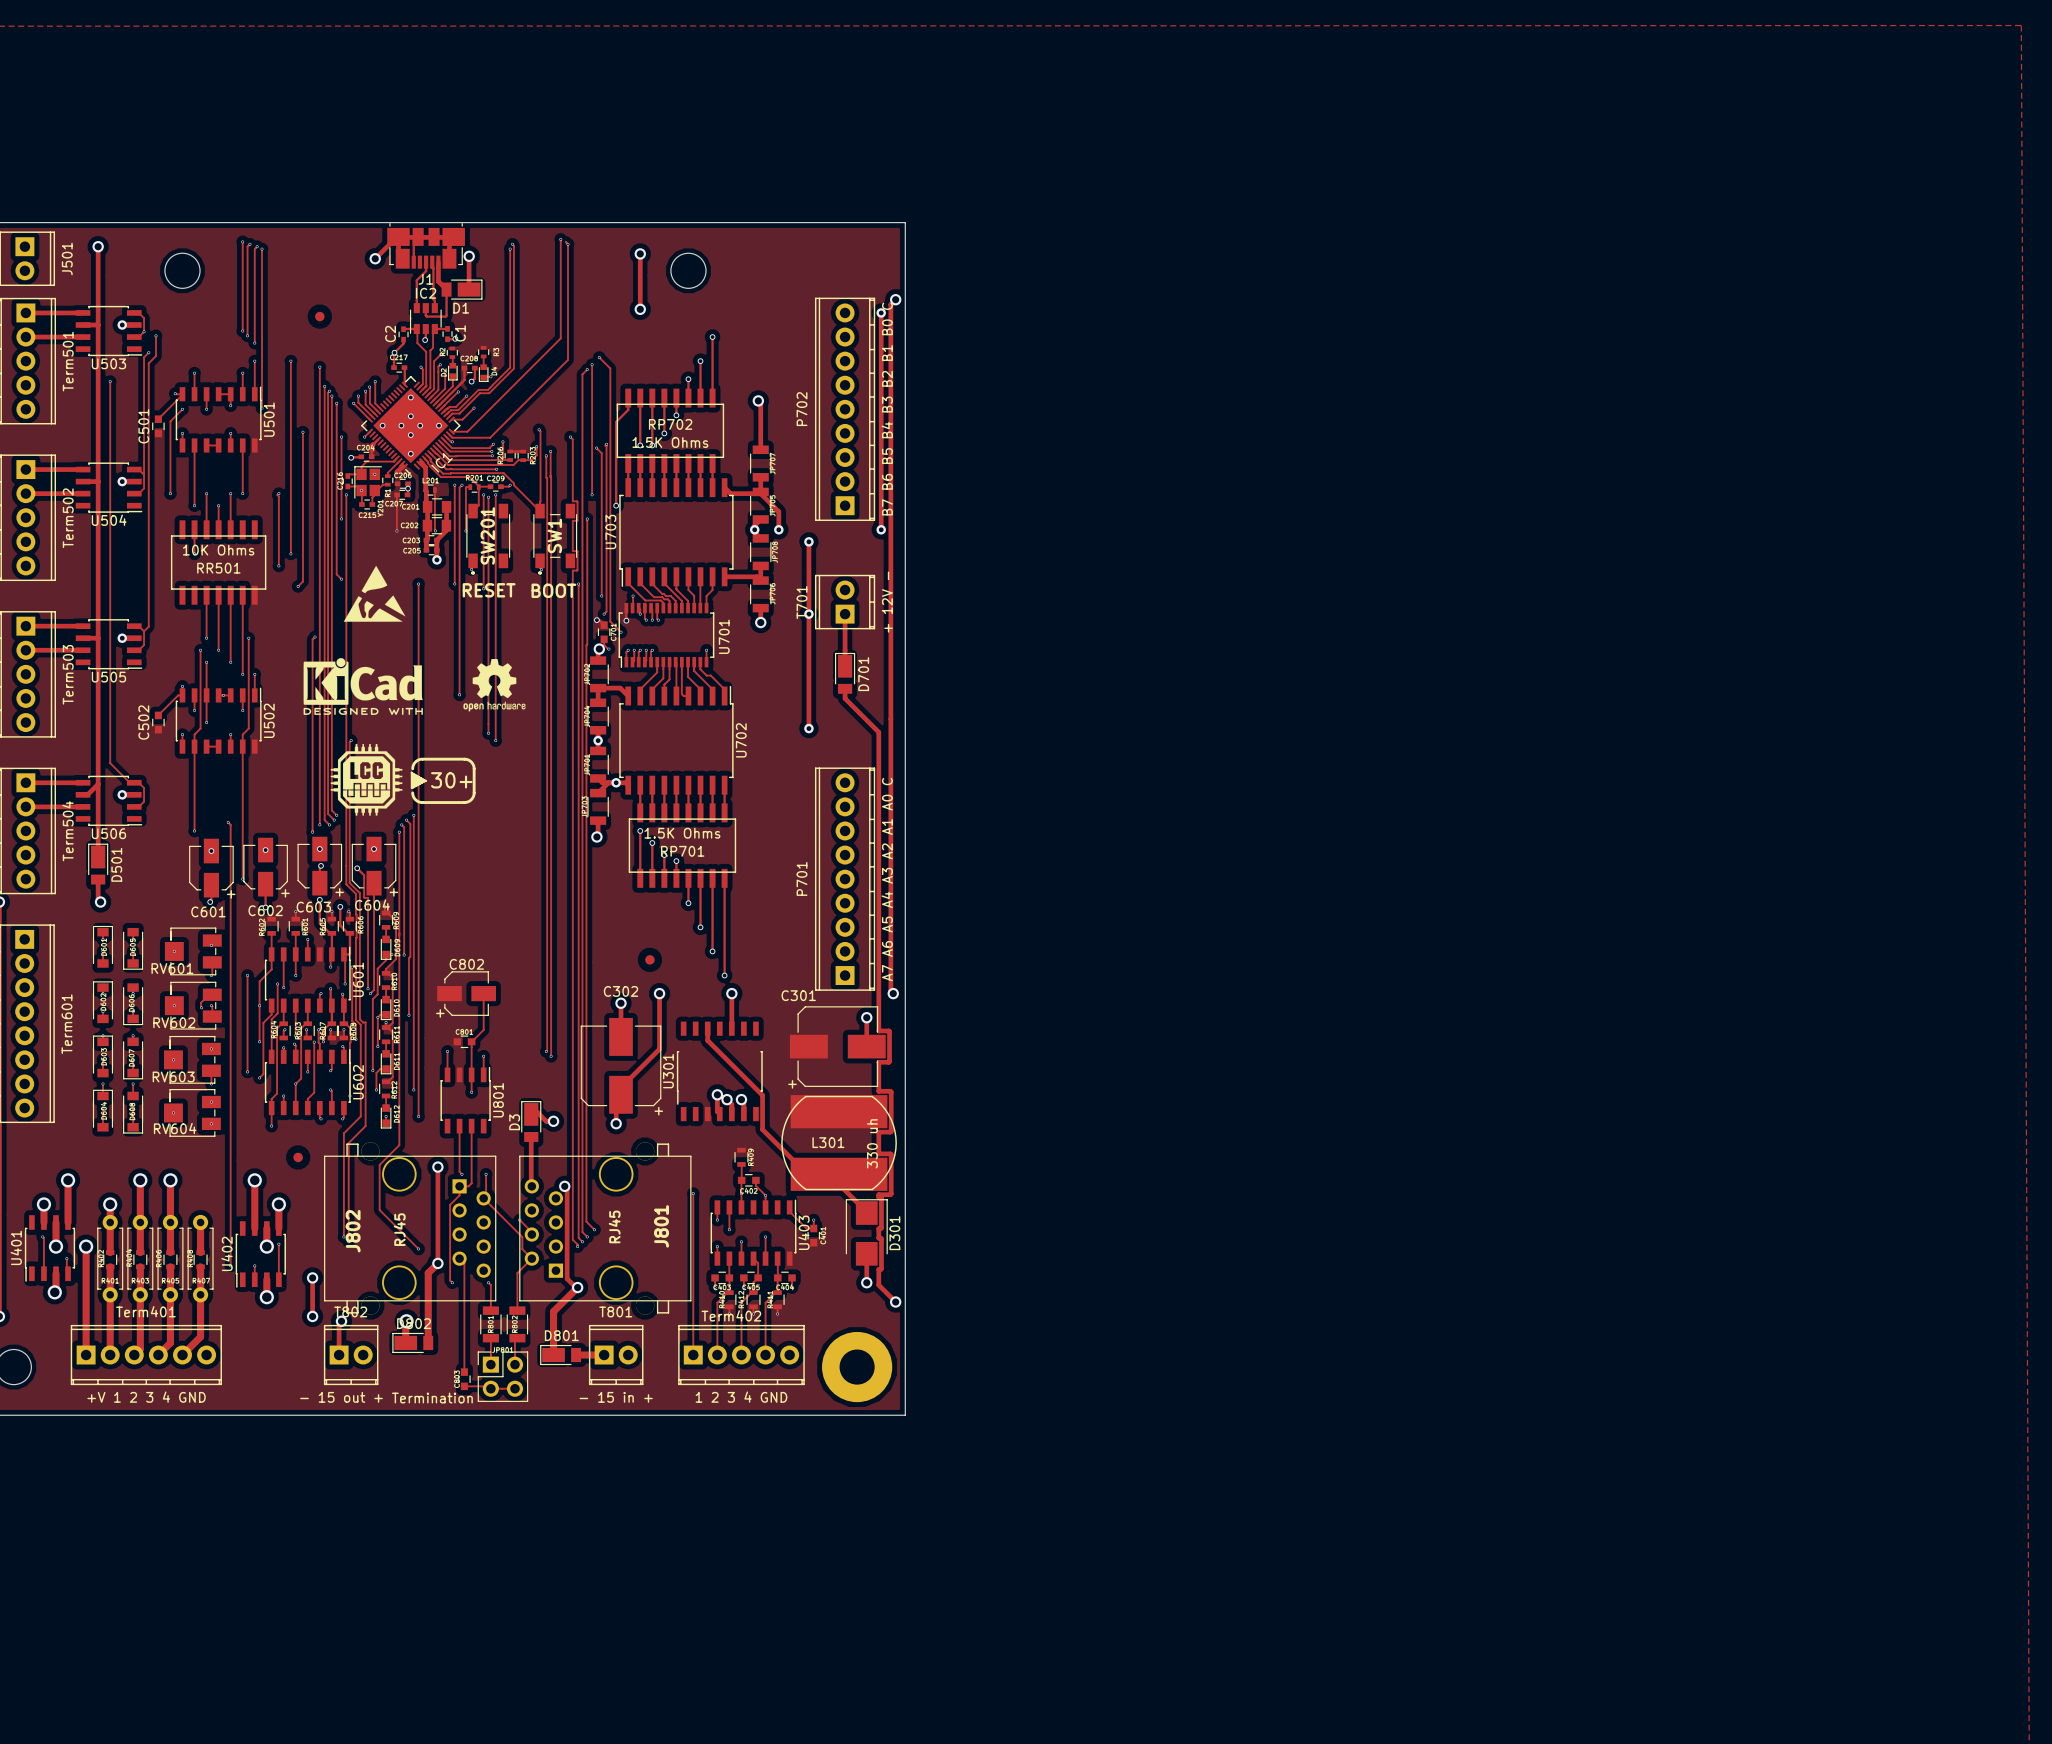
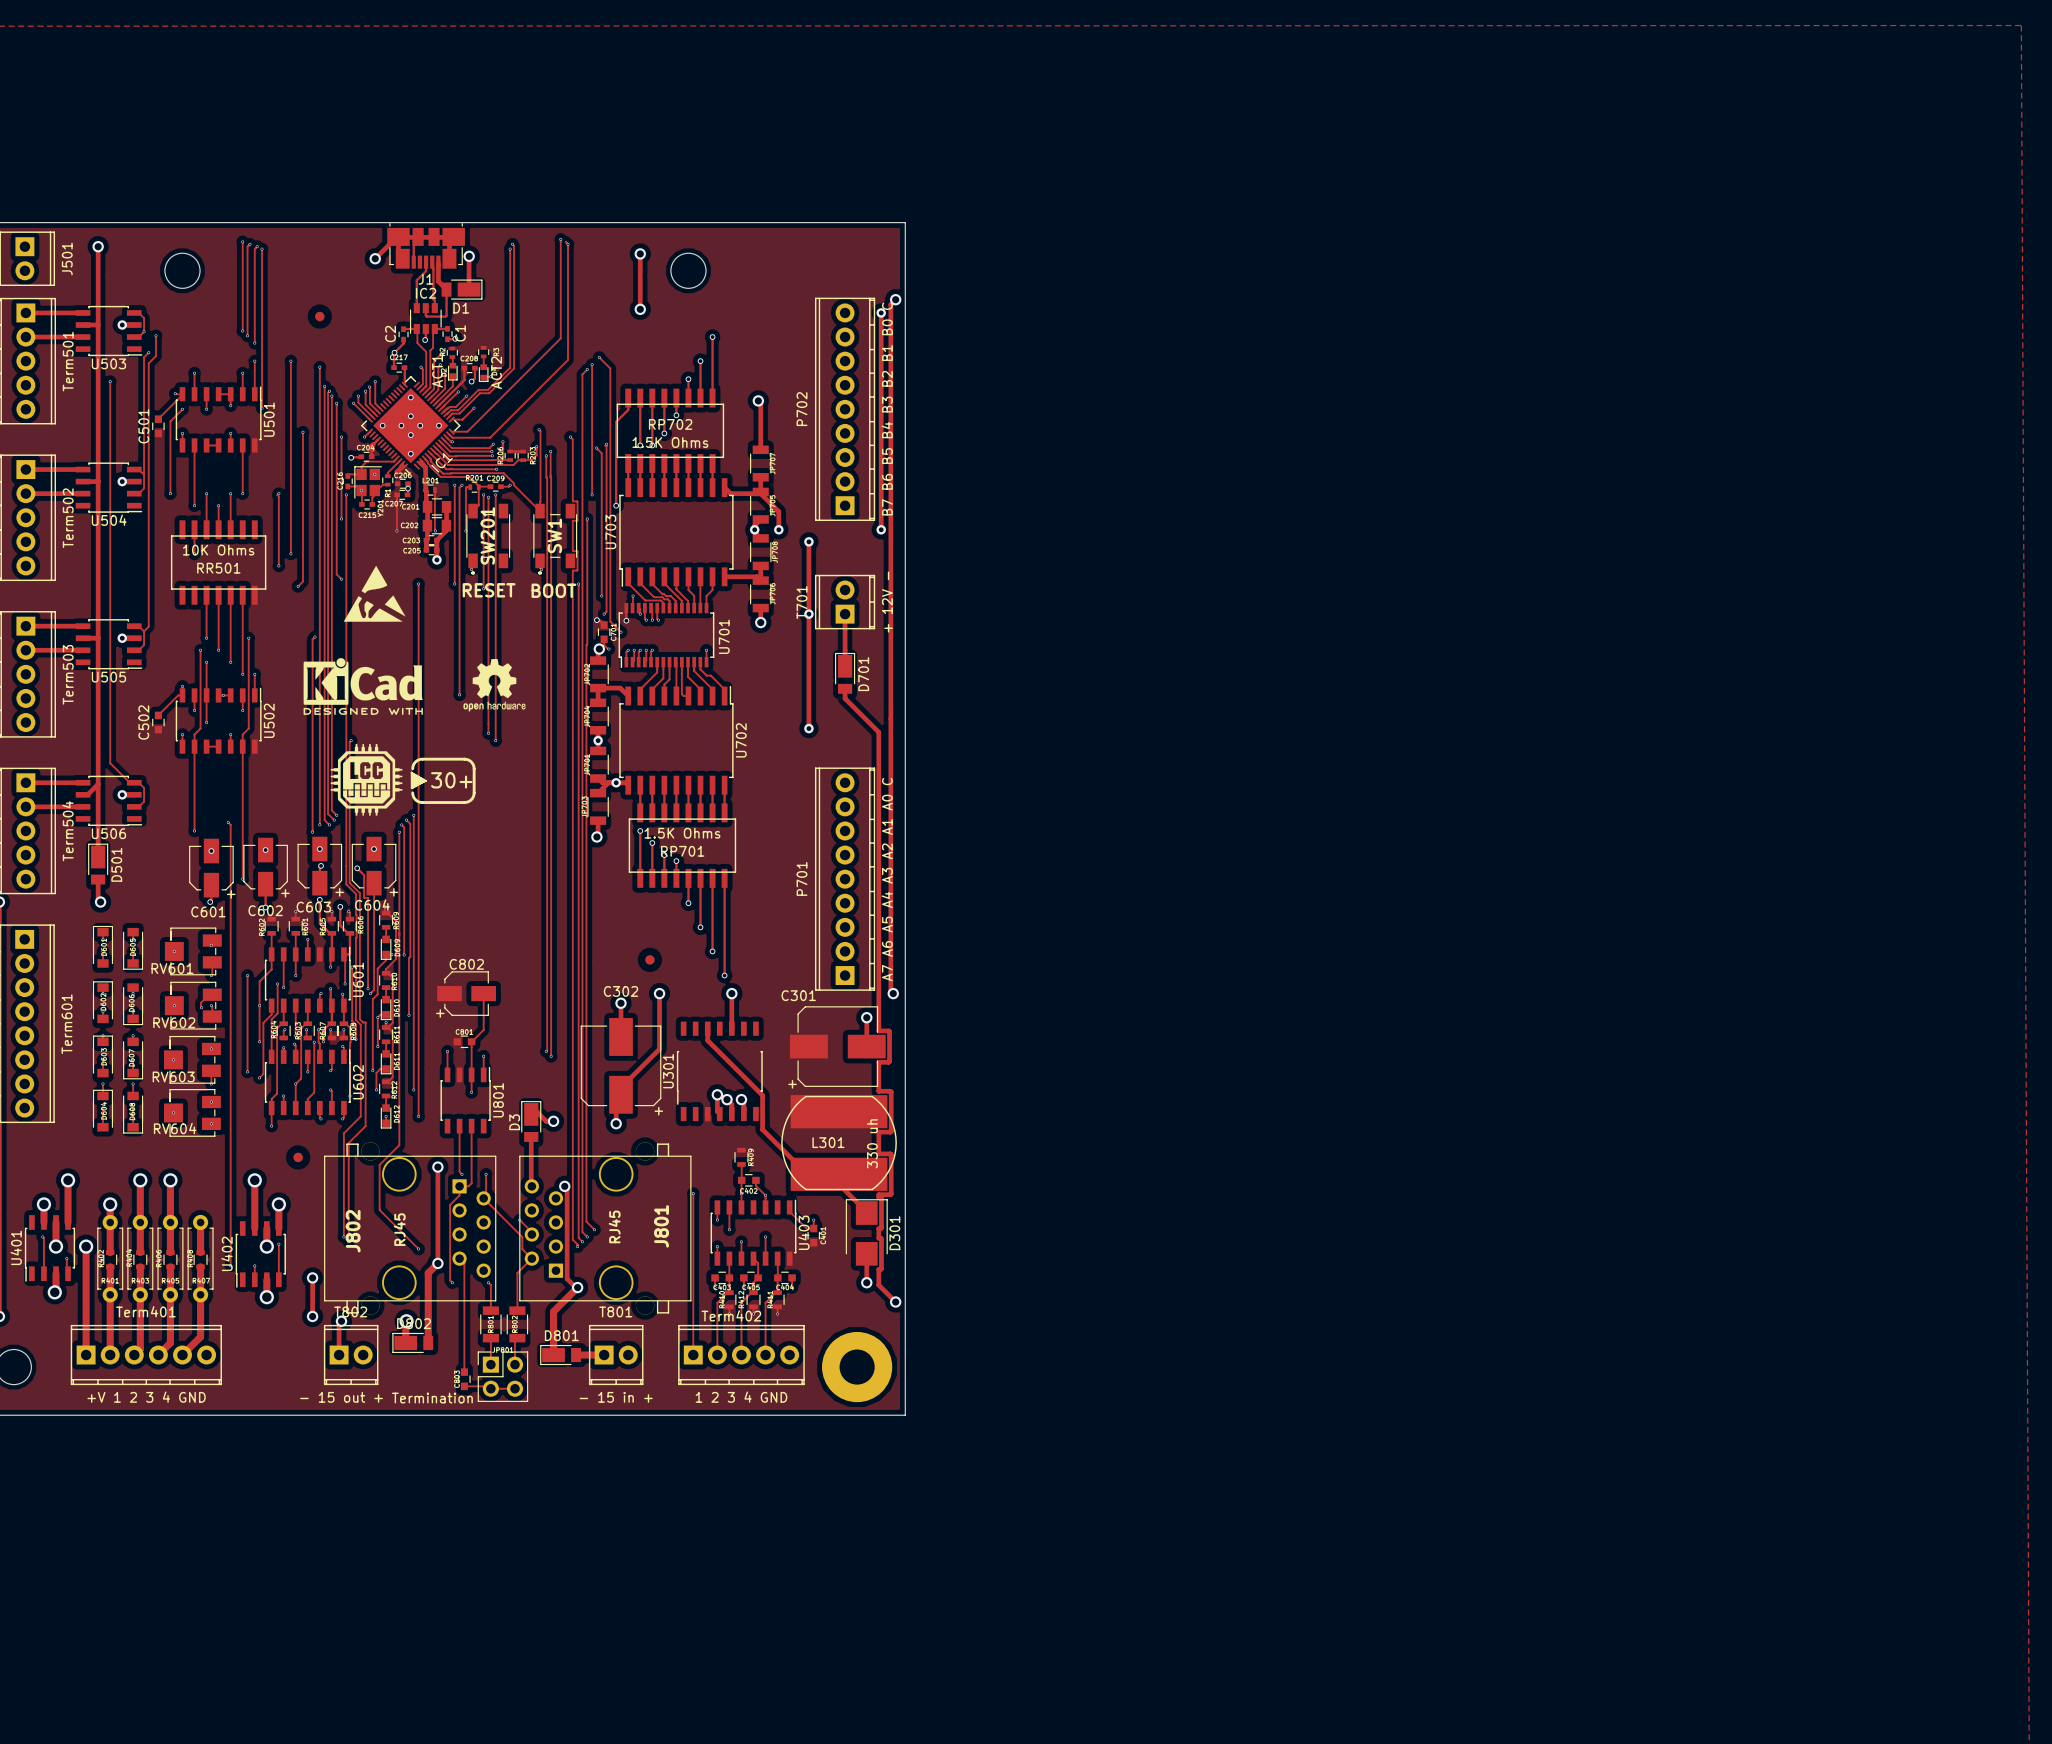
part value: none -> ACT1 (437, 371)
part value: none -> ACT2 (496, 372)

